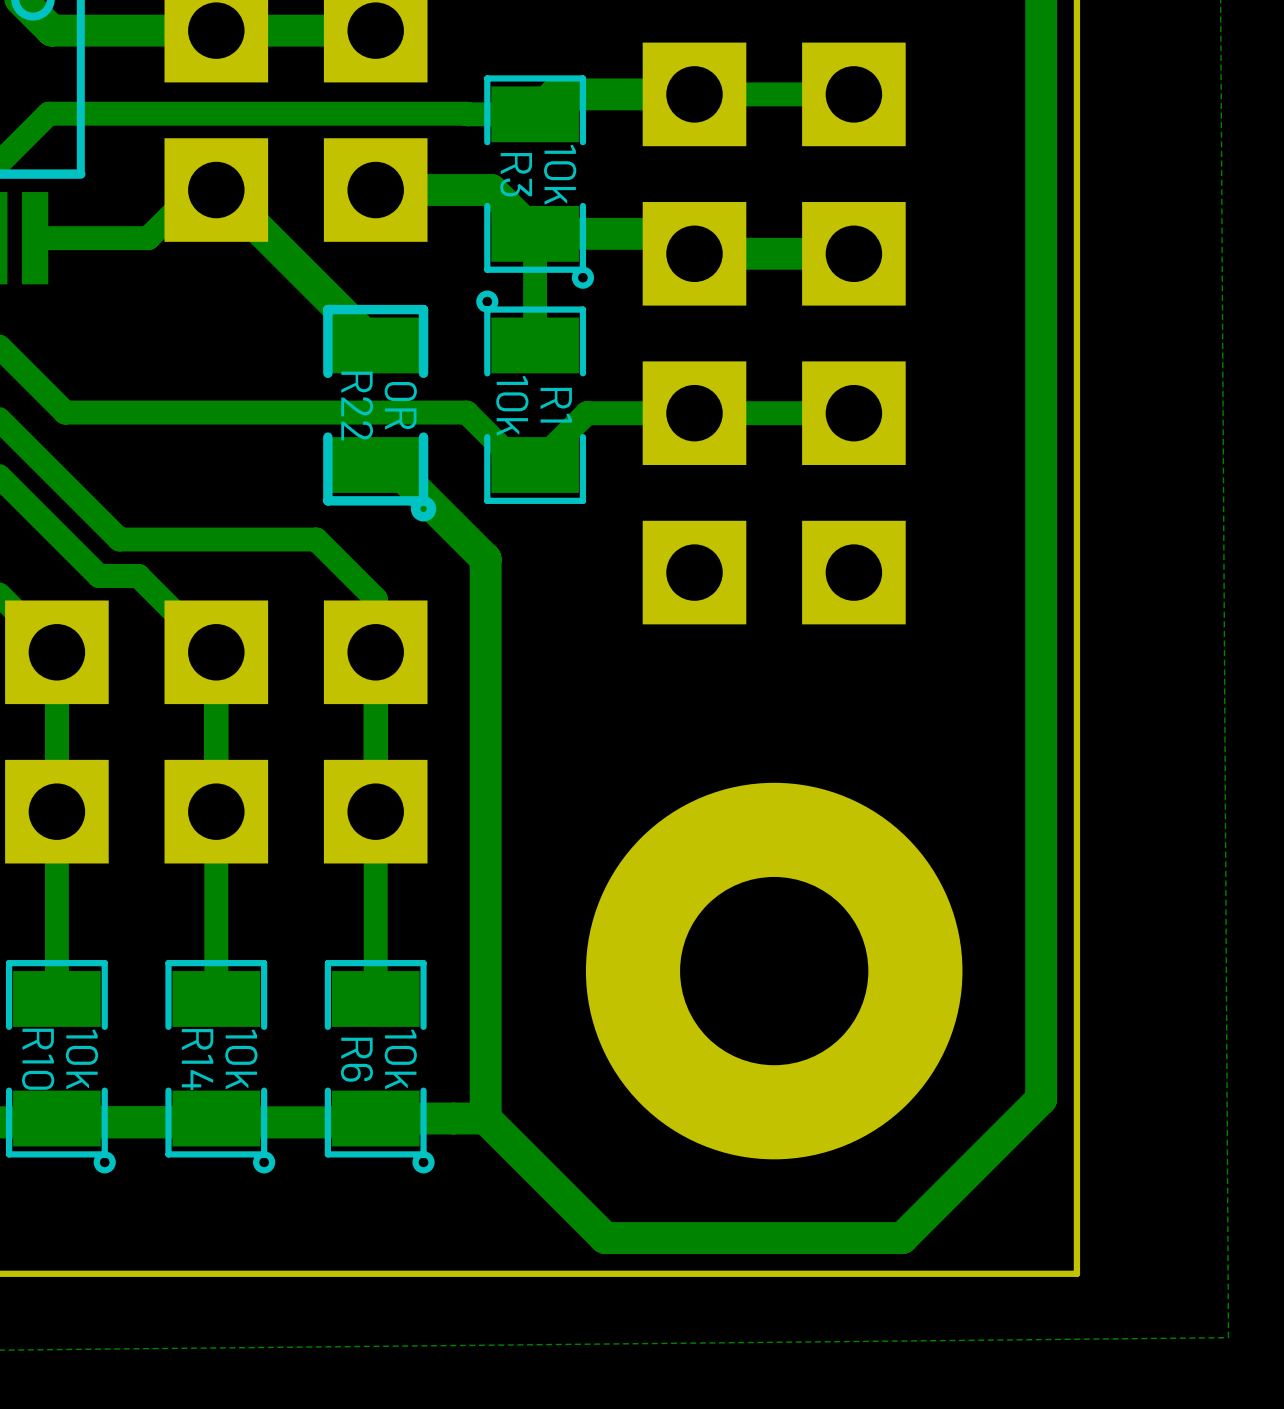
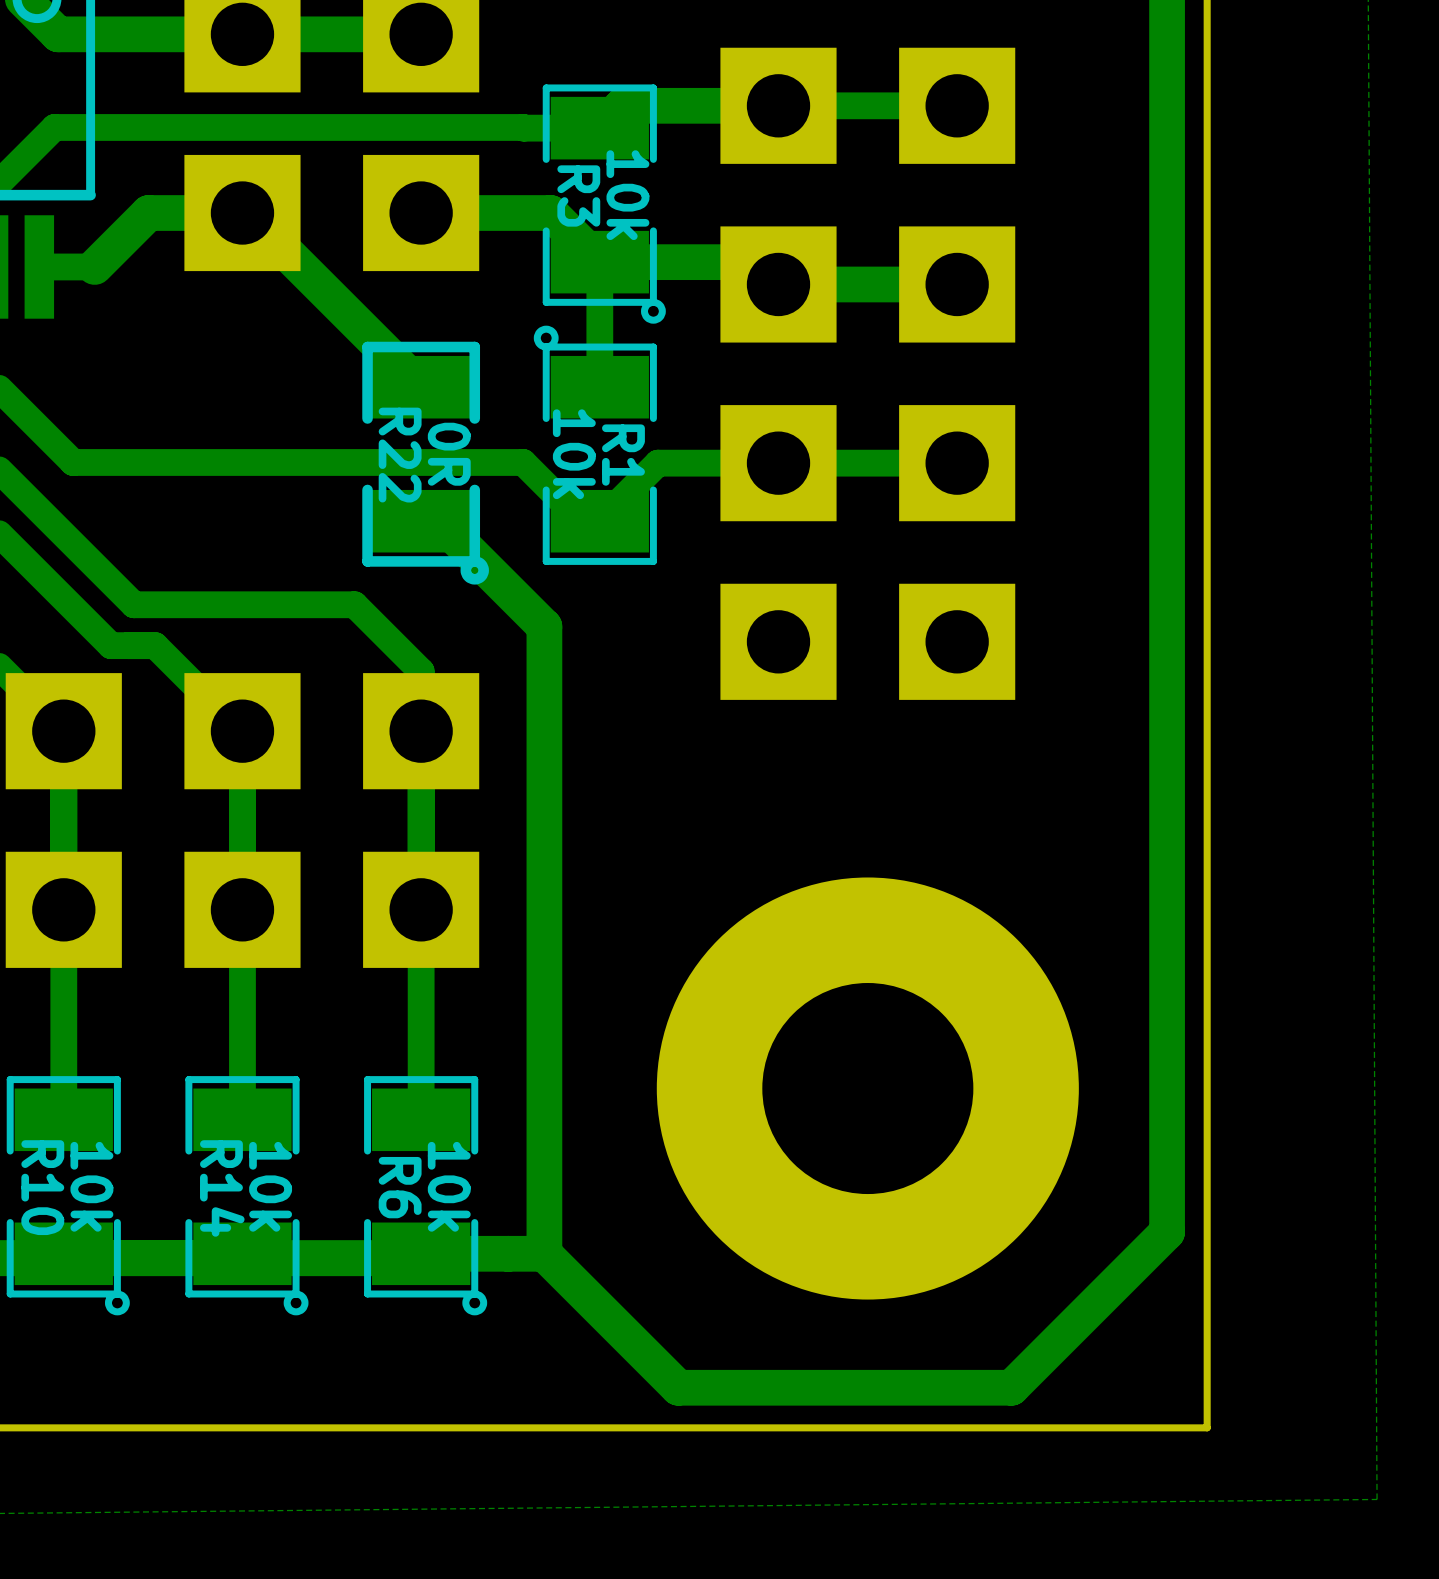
bottom track: (196, 190) (148, 238) (84, 238) -> (242, 213) (148, 213) (94, 266)

